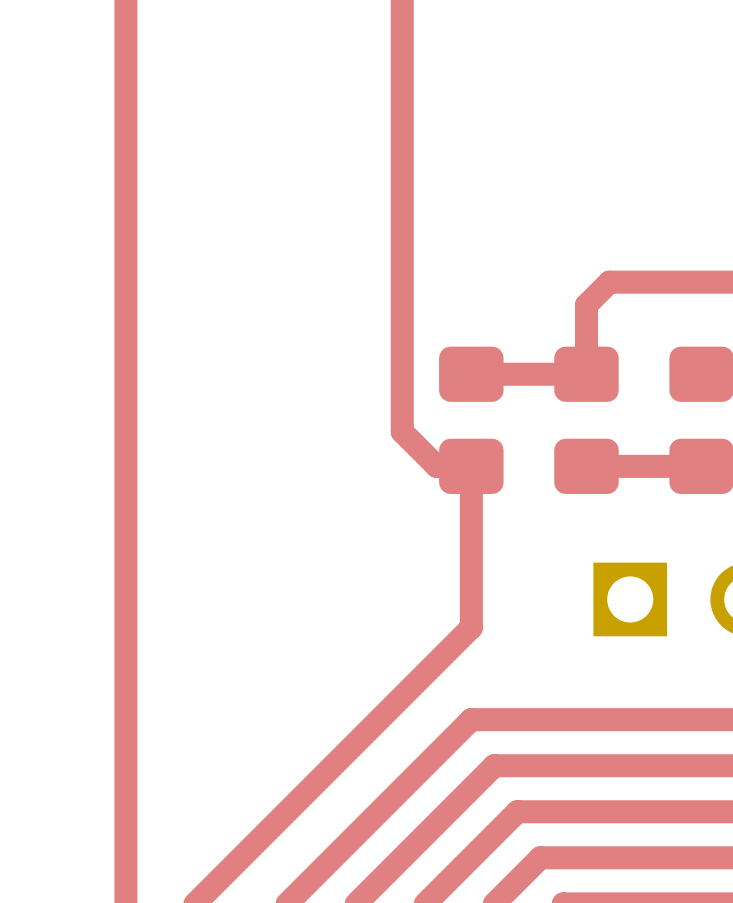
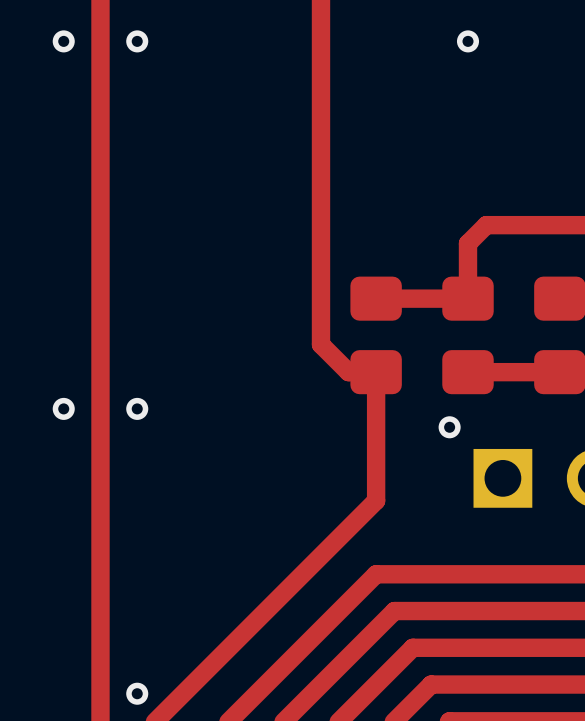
via: none -> (63, 41)
via: none -> (137, 41)
via: none -> (468, 41)
via: none -> (63, 408)
via: none -> (137, 408)
via: none -> (449, 427)
via: none -> (137, 693)

